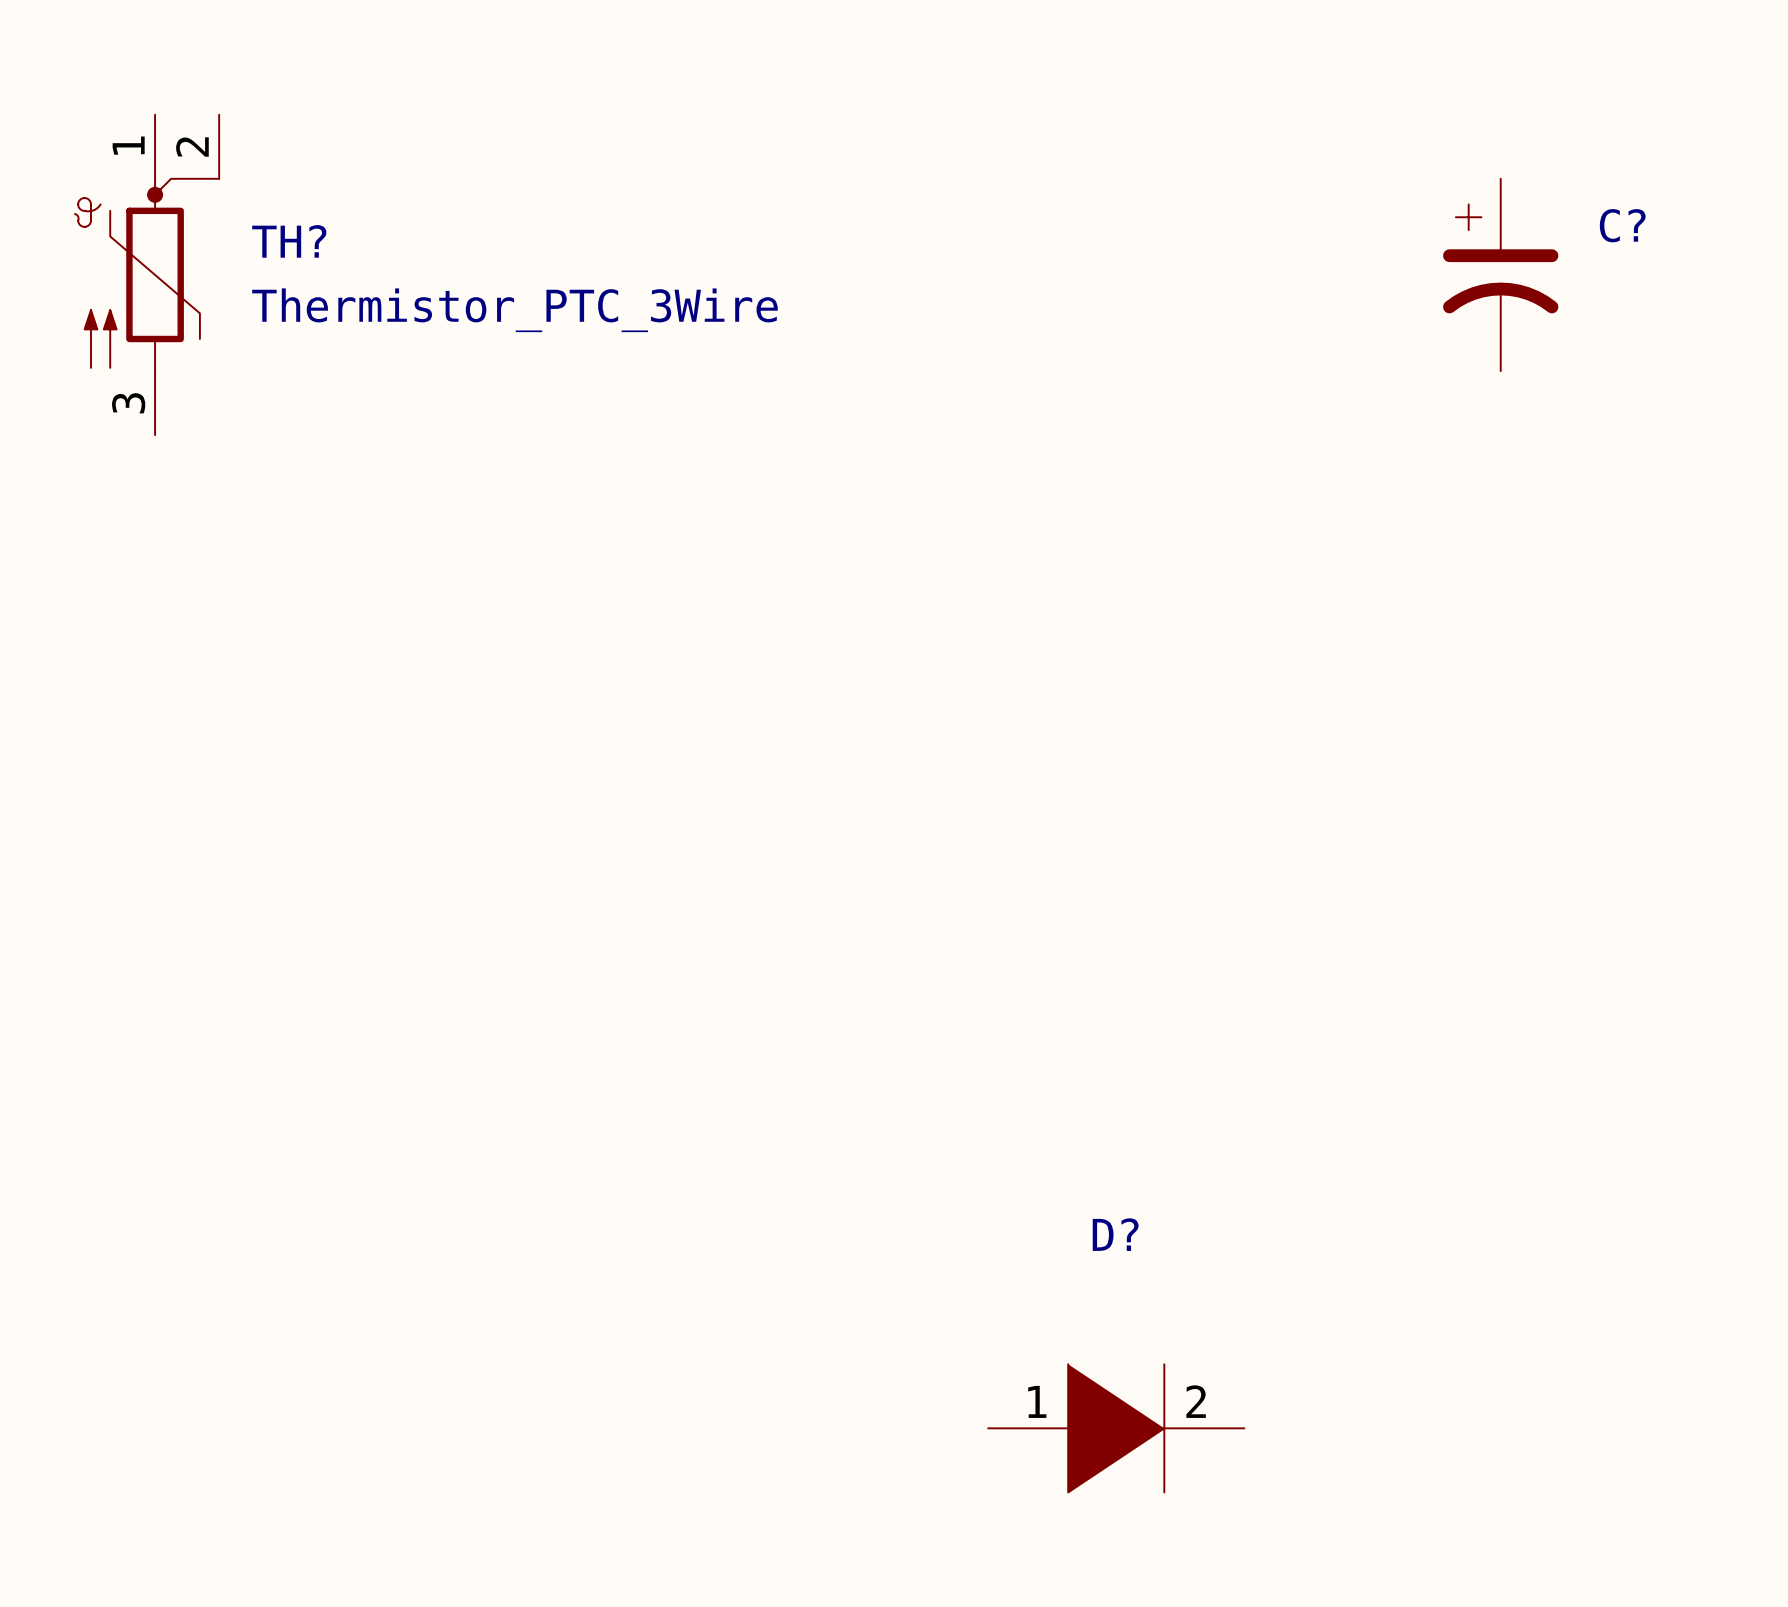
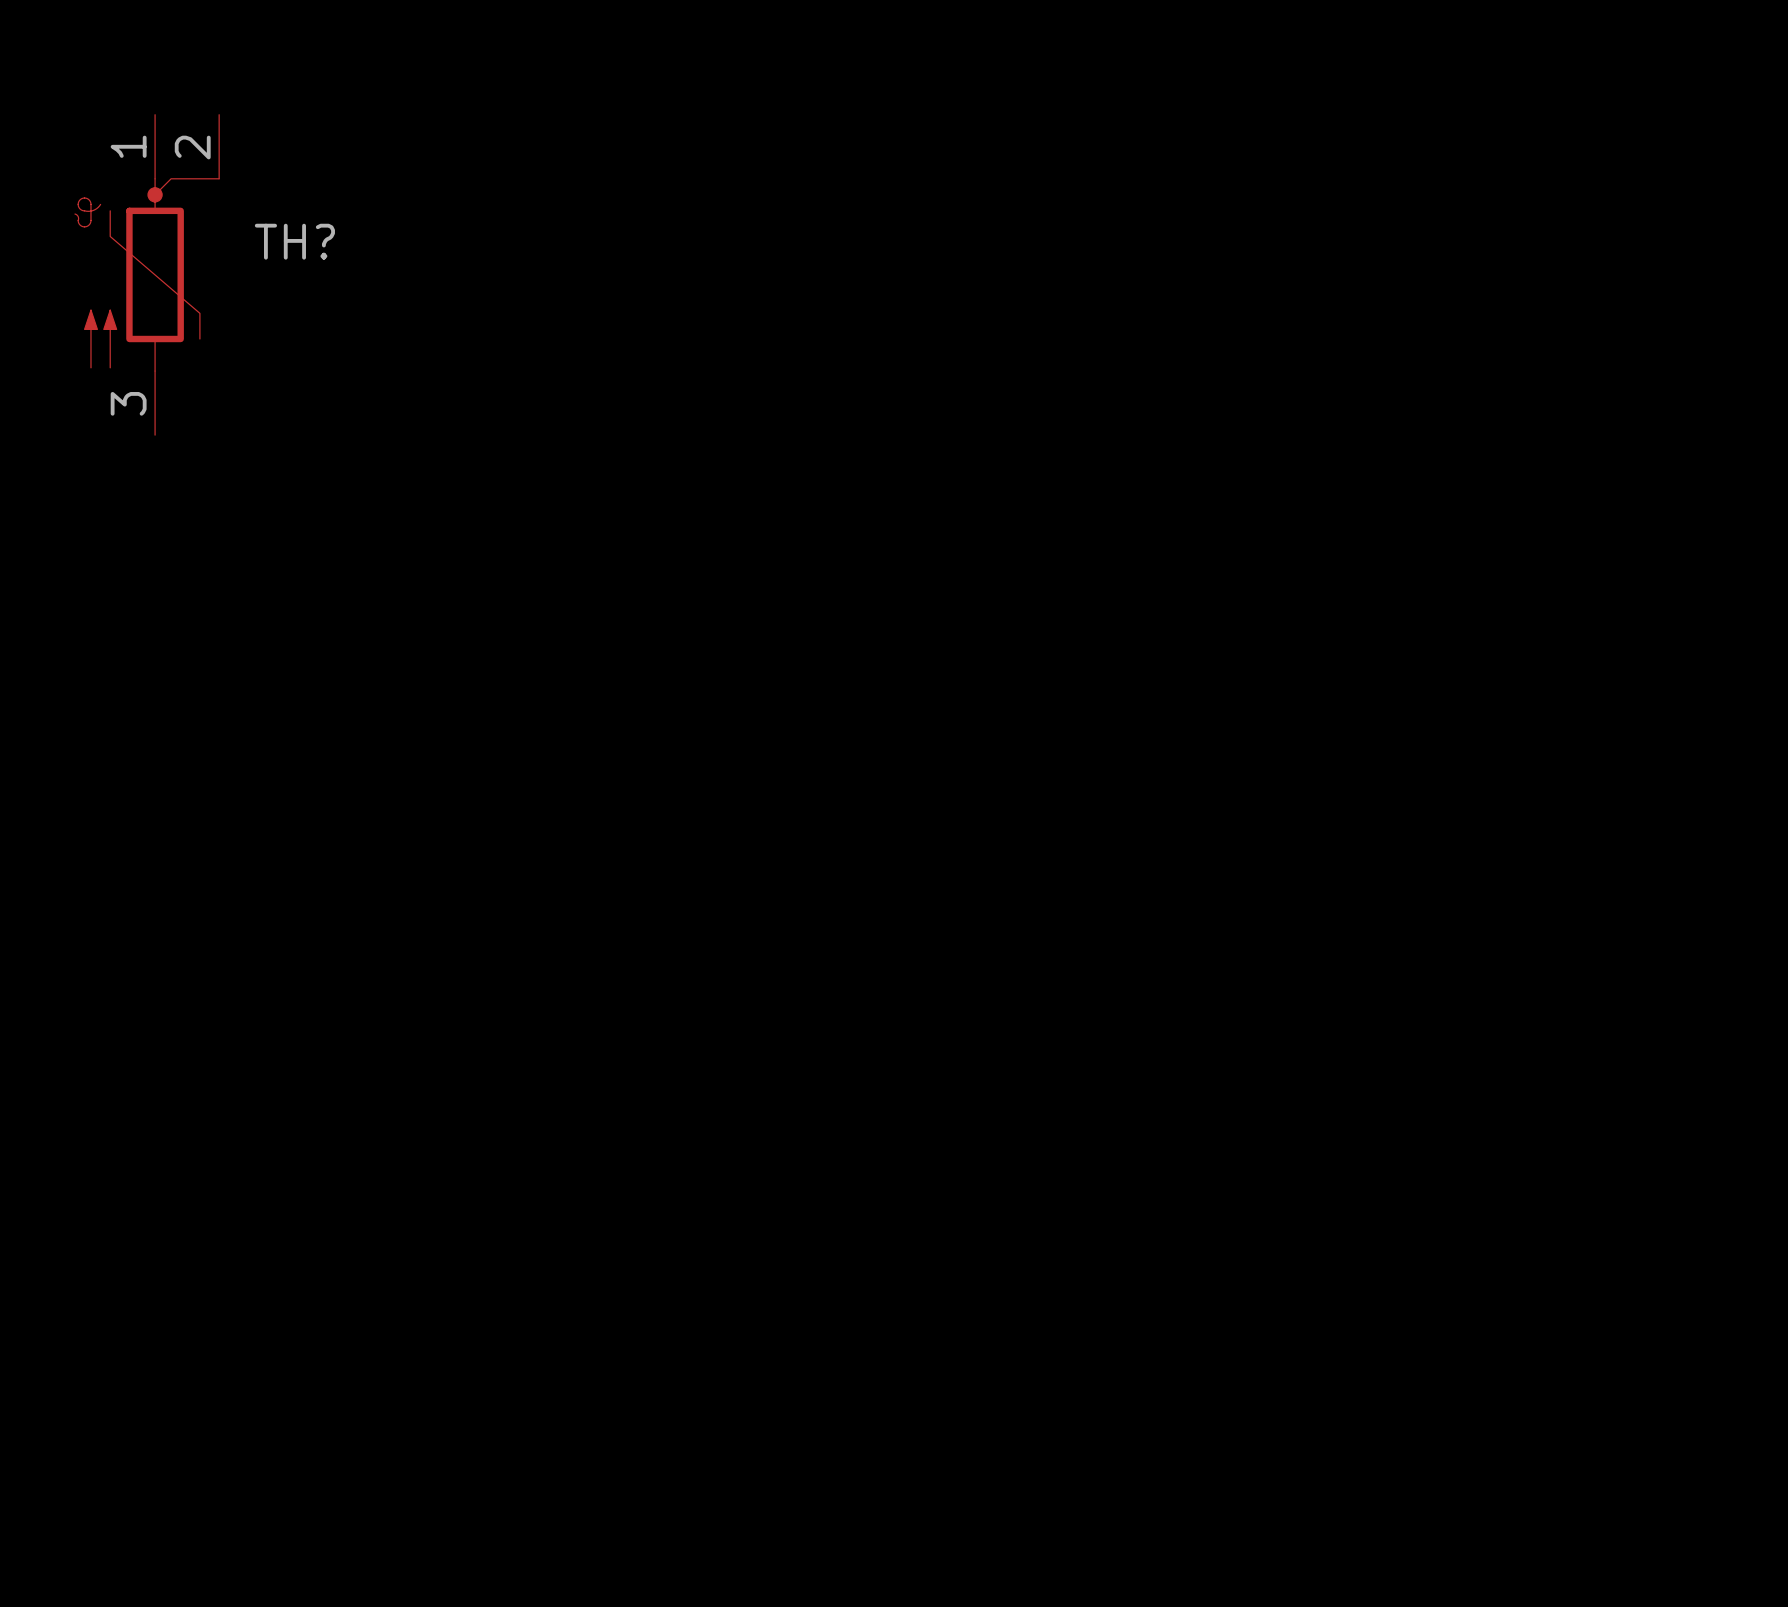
C?: (1500, 274) -> none
TH? value: Thermistor_PTC_3Wire (514, 310) -> none
D?: (1116, 1428) -> none

